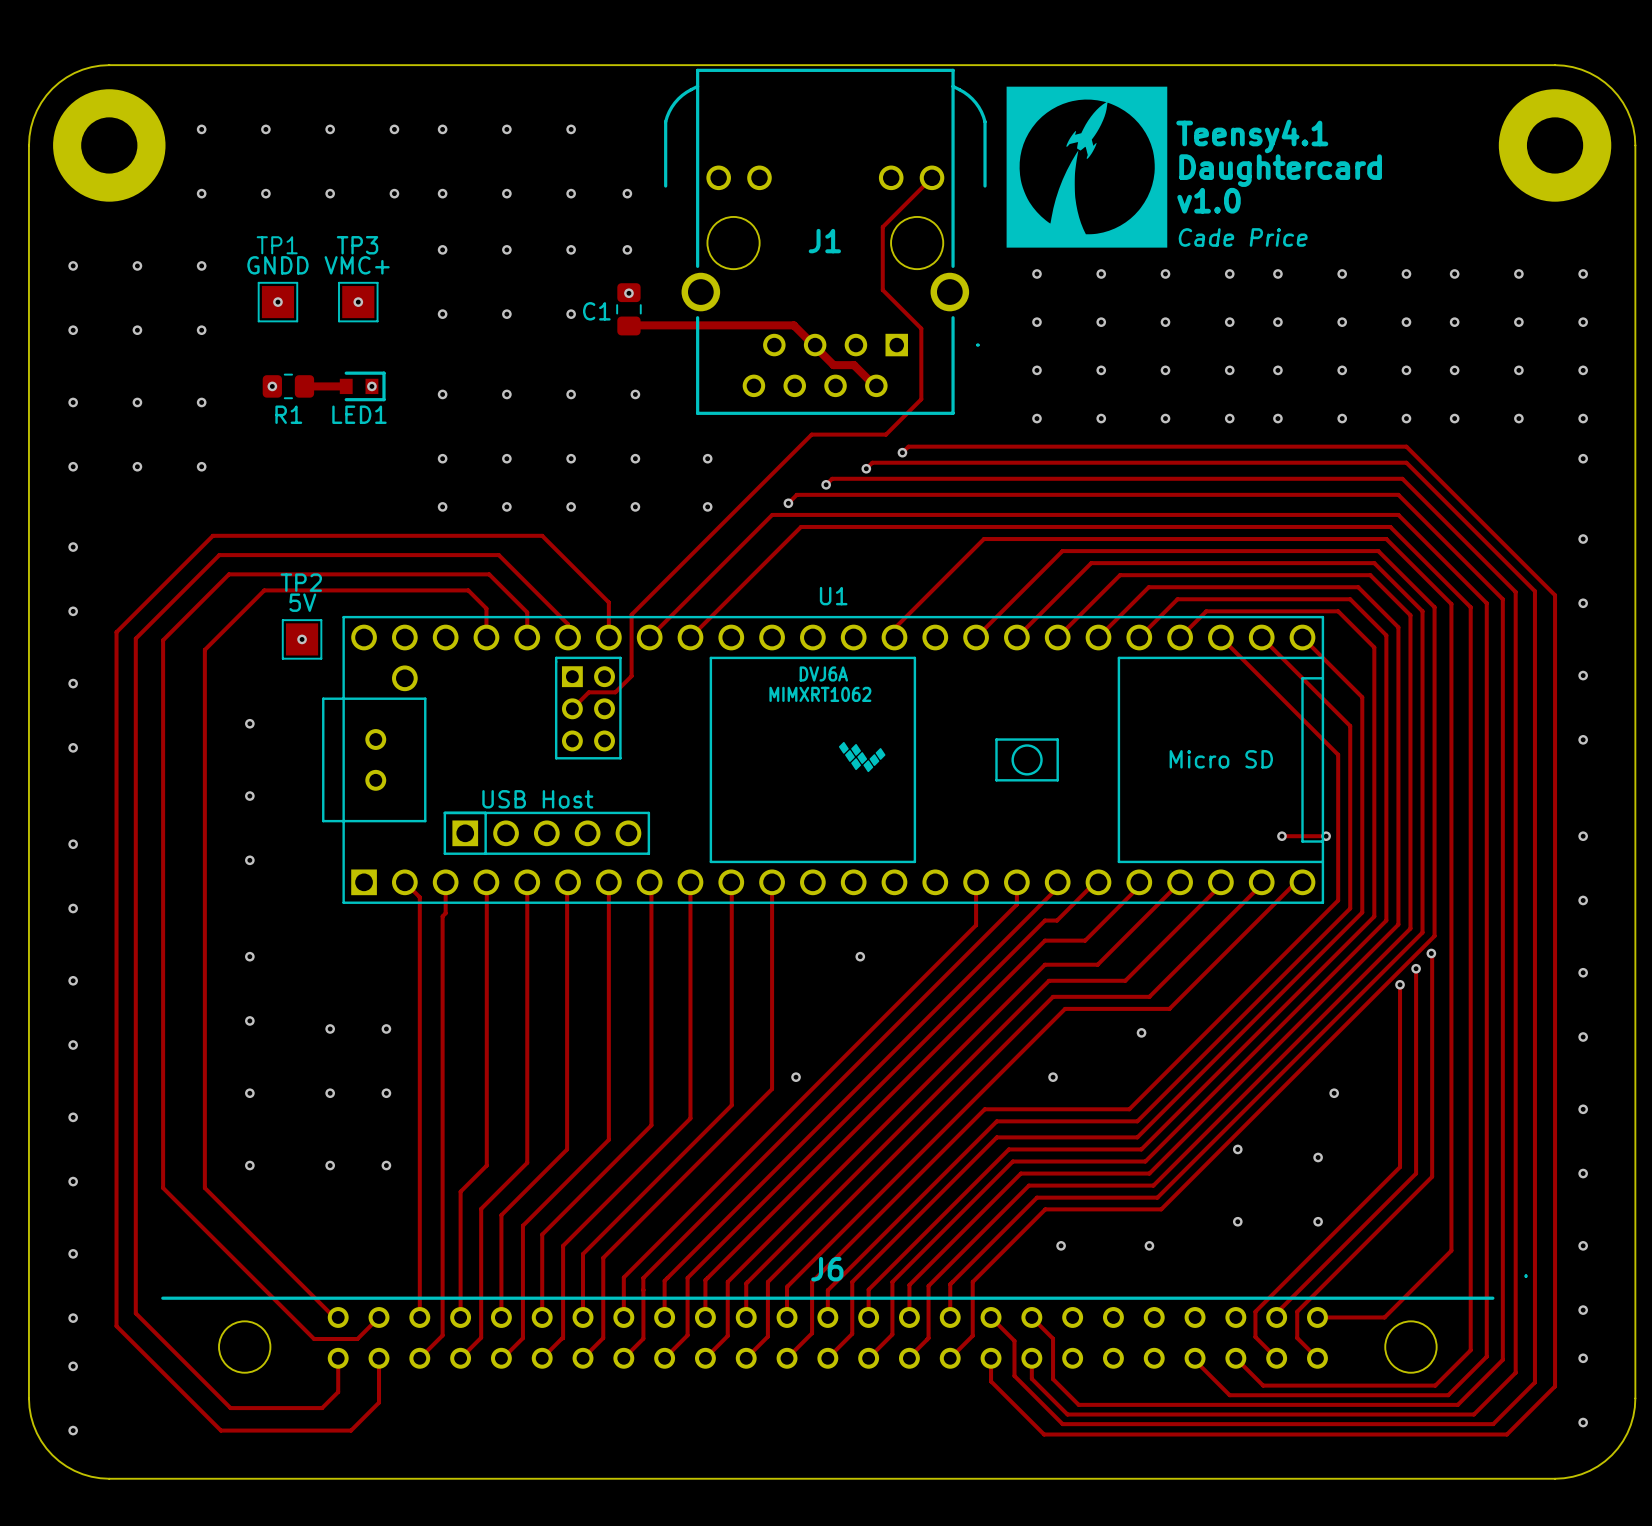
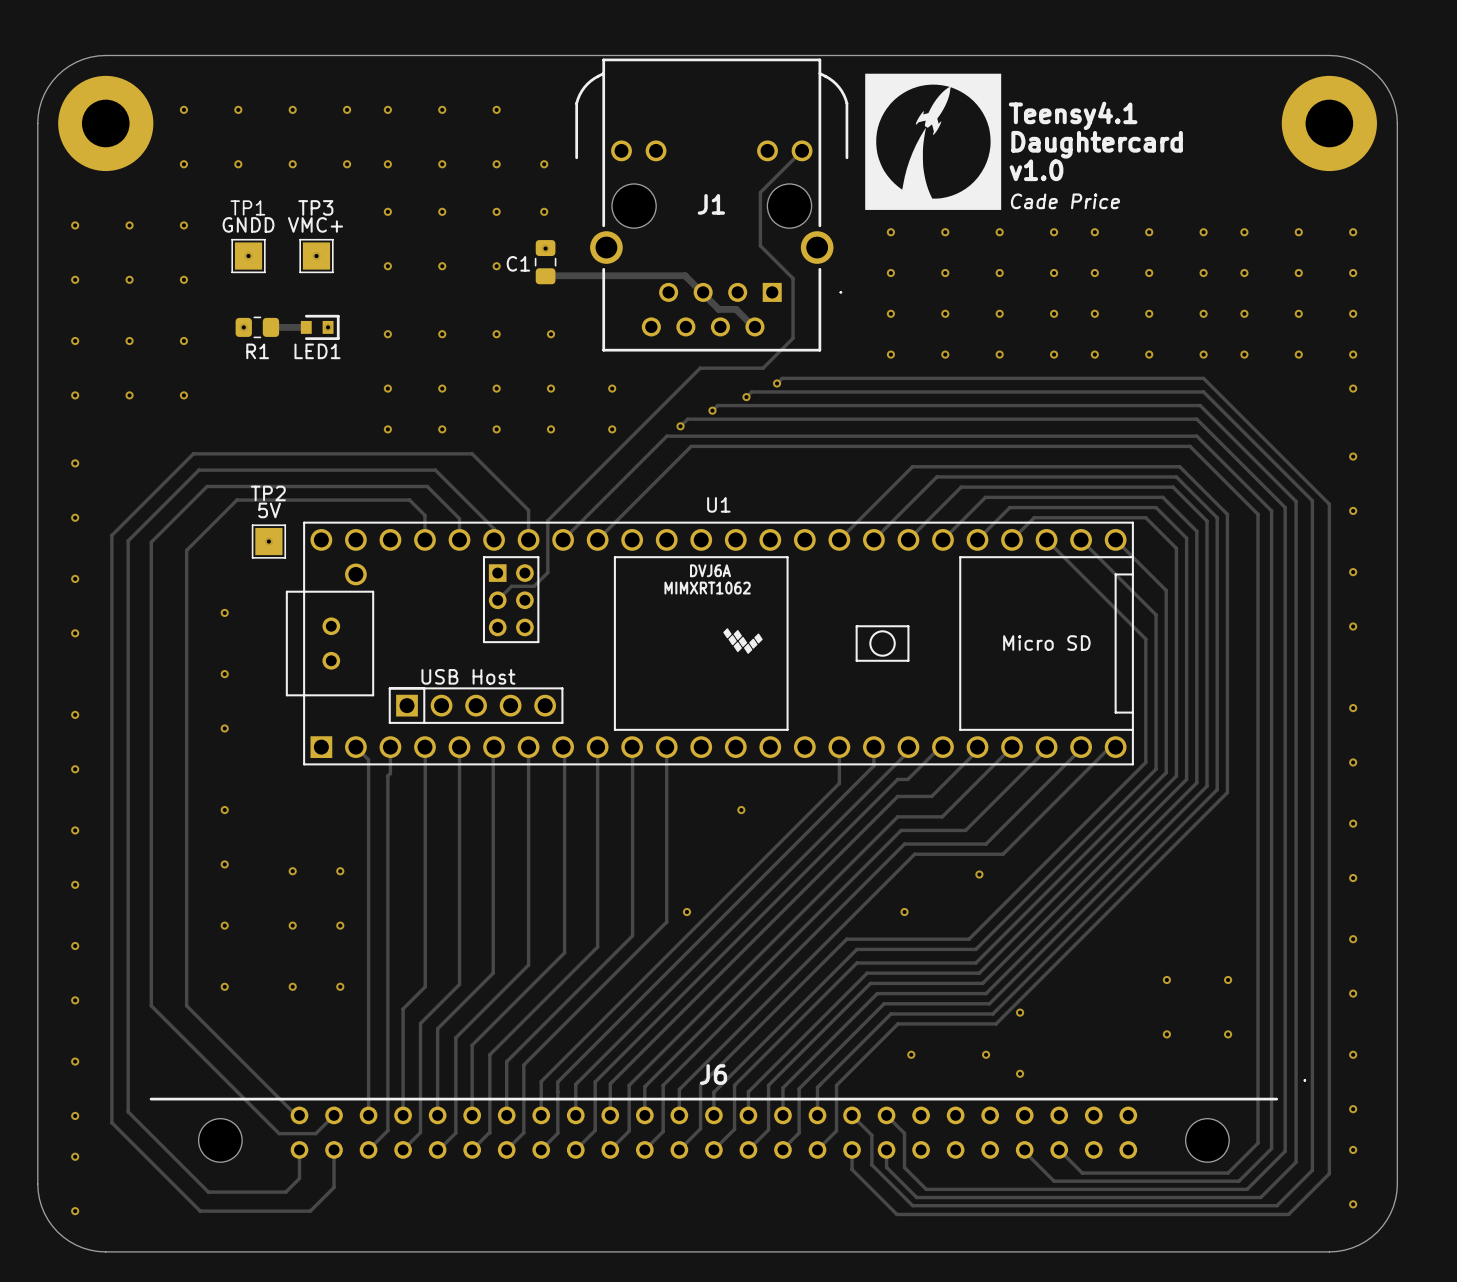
track: (894, 637) (894, 628) (983, 539) (1386, 539) (1451, 604) (1451, 1250) (1384, 1317) (1317, 1317) -> none
track: (1281, 836) (1326, 836) -> none
via: (1281, 836) -> none
via: (1326, 836) -> none
track: (1431, 953) (1432, 1176) (1297, 1311) (1297, 1338) (1317, 1358) -> none
via: (1431, 953) -> none
track: (1416, 968) (1416, 1173) (1276, 1312) (1276, 1317) -> none
via: (1416, 968) -> none
track: (1400, 984) (1400, 1167) (1255, 1311) (1255, 1337) (1276, 1358) -> none
via: (1400, 984) -> none
via: (1334, 1093) -> none
via: (1237, 1149) -> none
via: (1318, 1157) -> none
via: none -> (1166, 980)
via: none -> (1228, 980)
via: none -> (1020, 1012)
via: (1237, 1221) -> none
via: (1318, 1221) -> none
via: none -> (1166, 1034)
via: none -> (1228, 1034)
via: none -> (1020, 1073)

